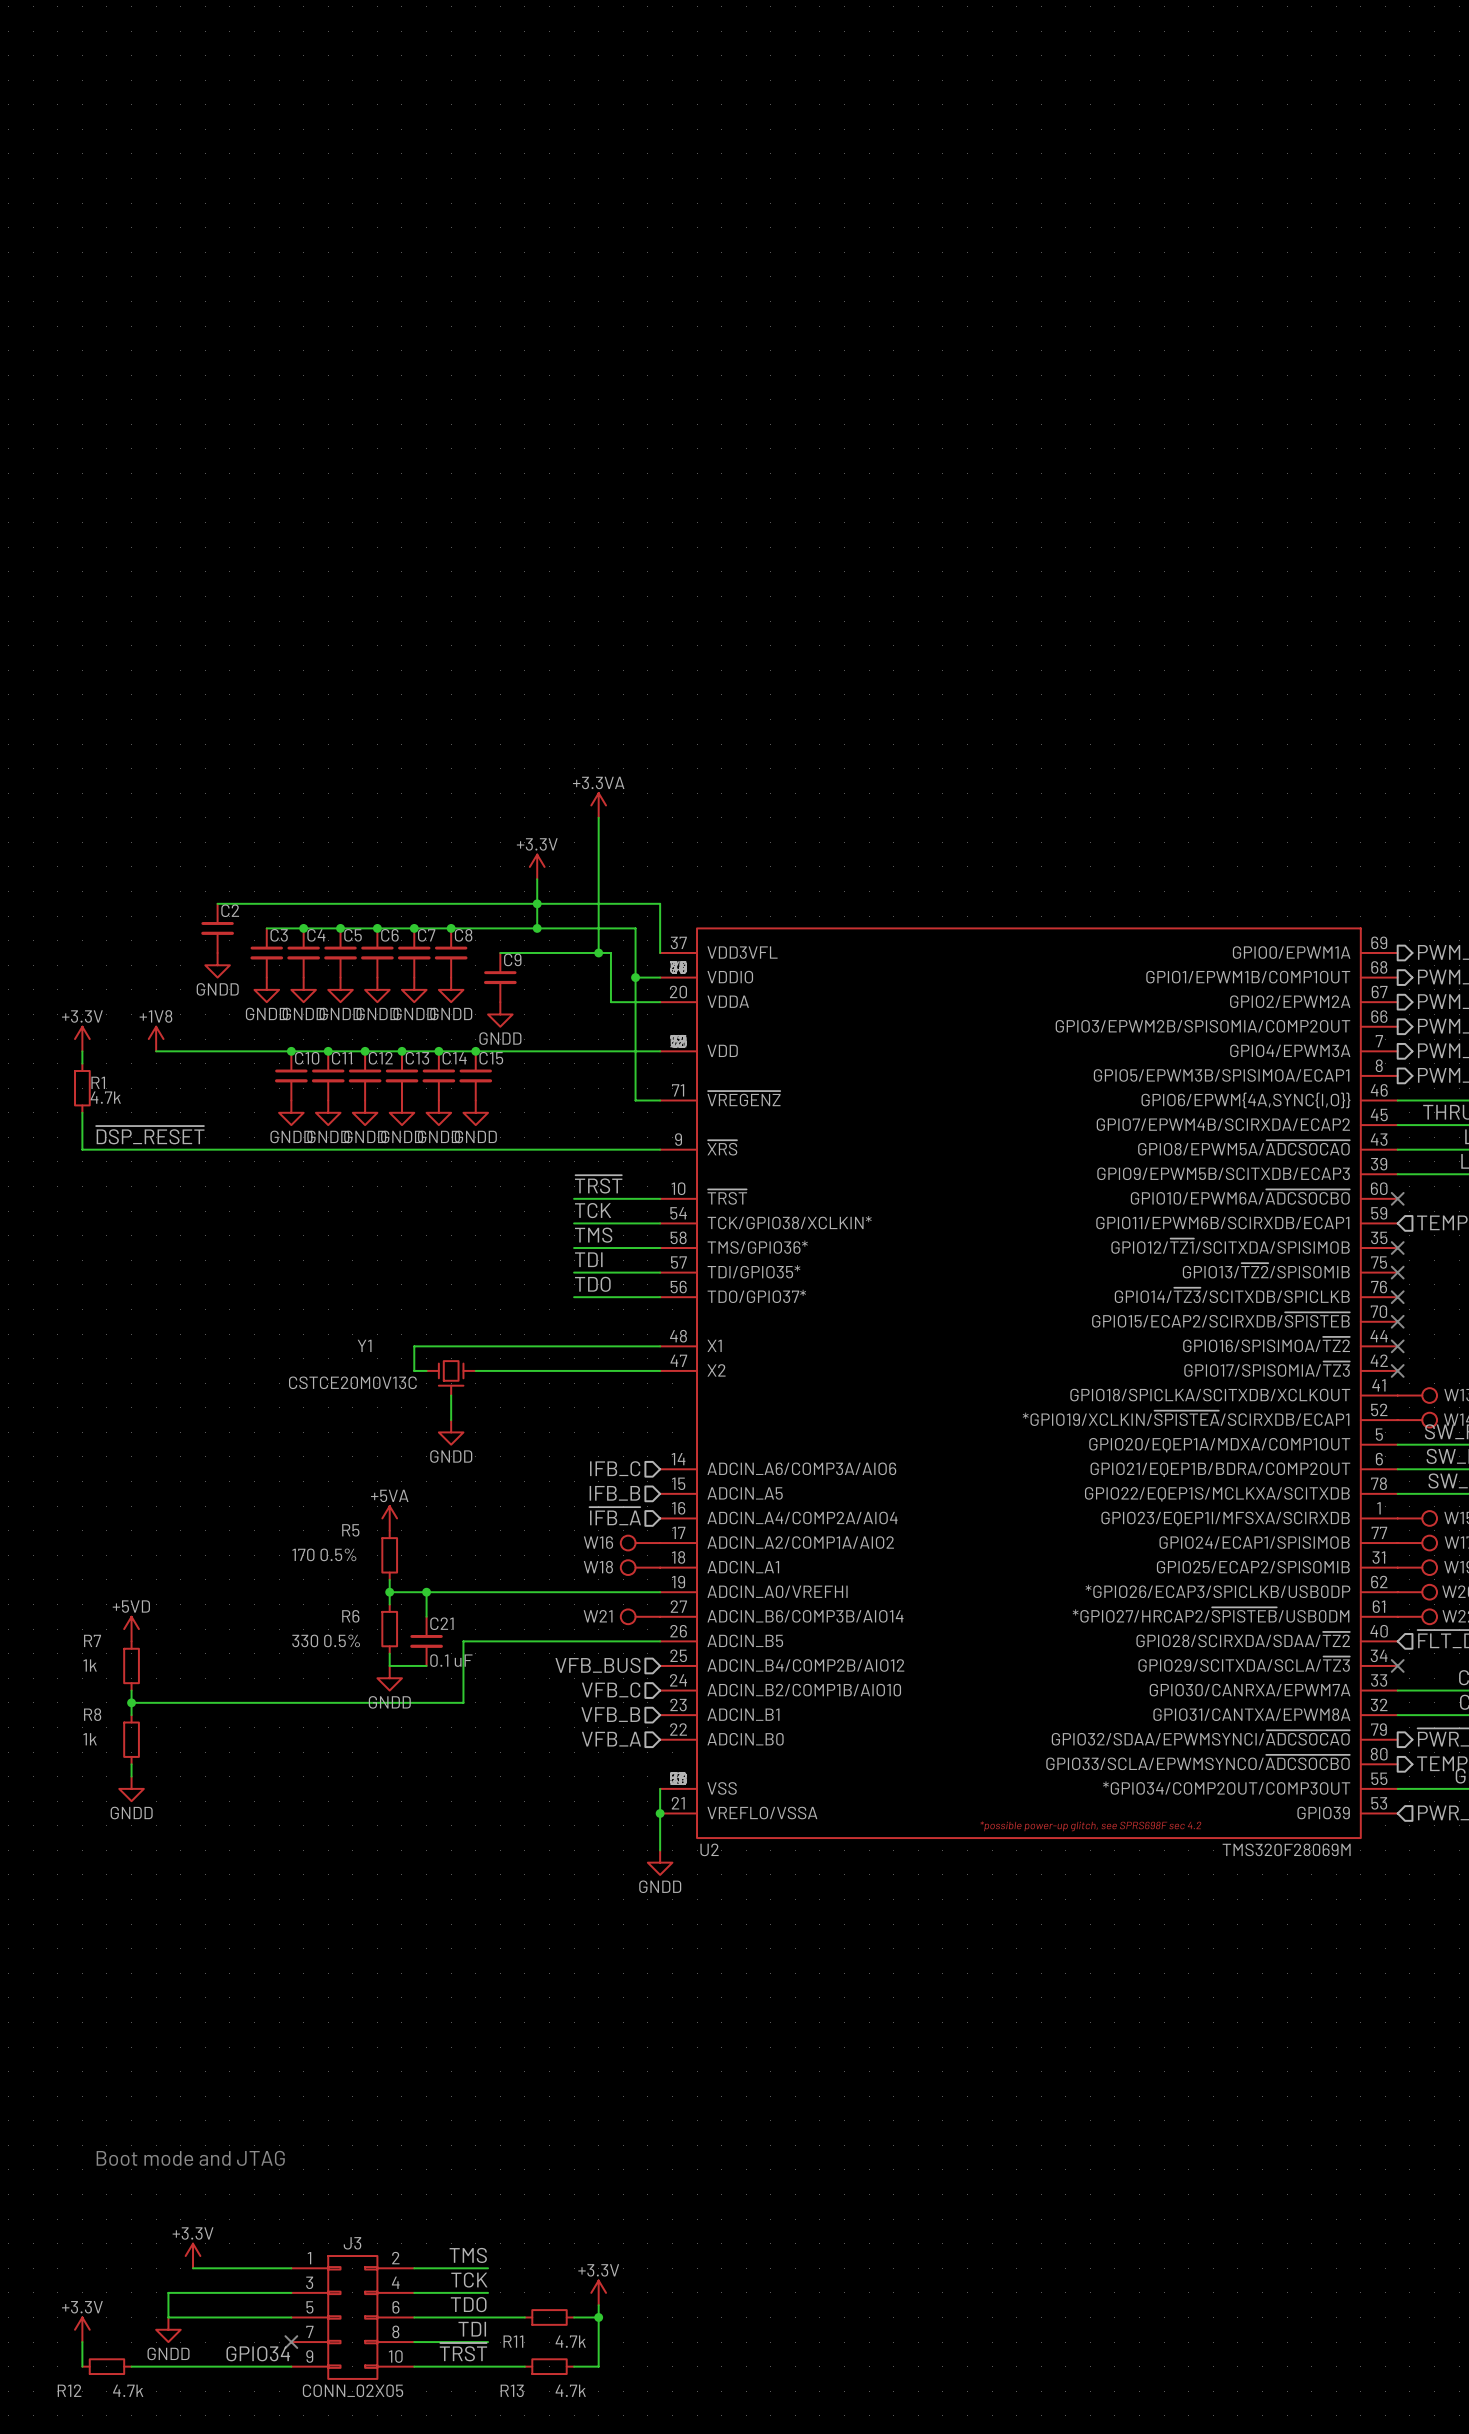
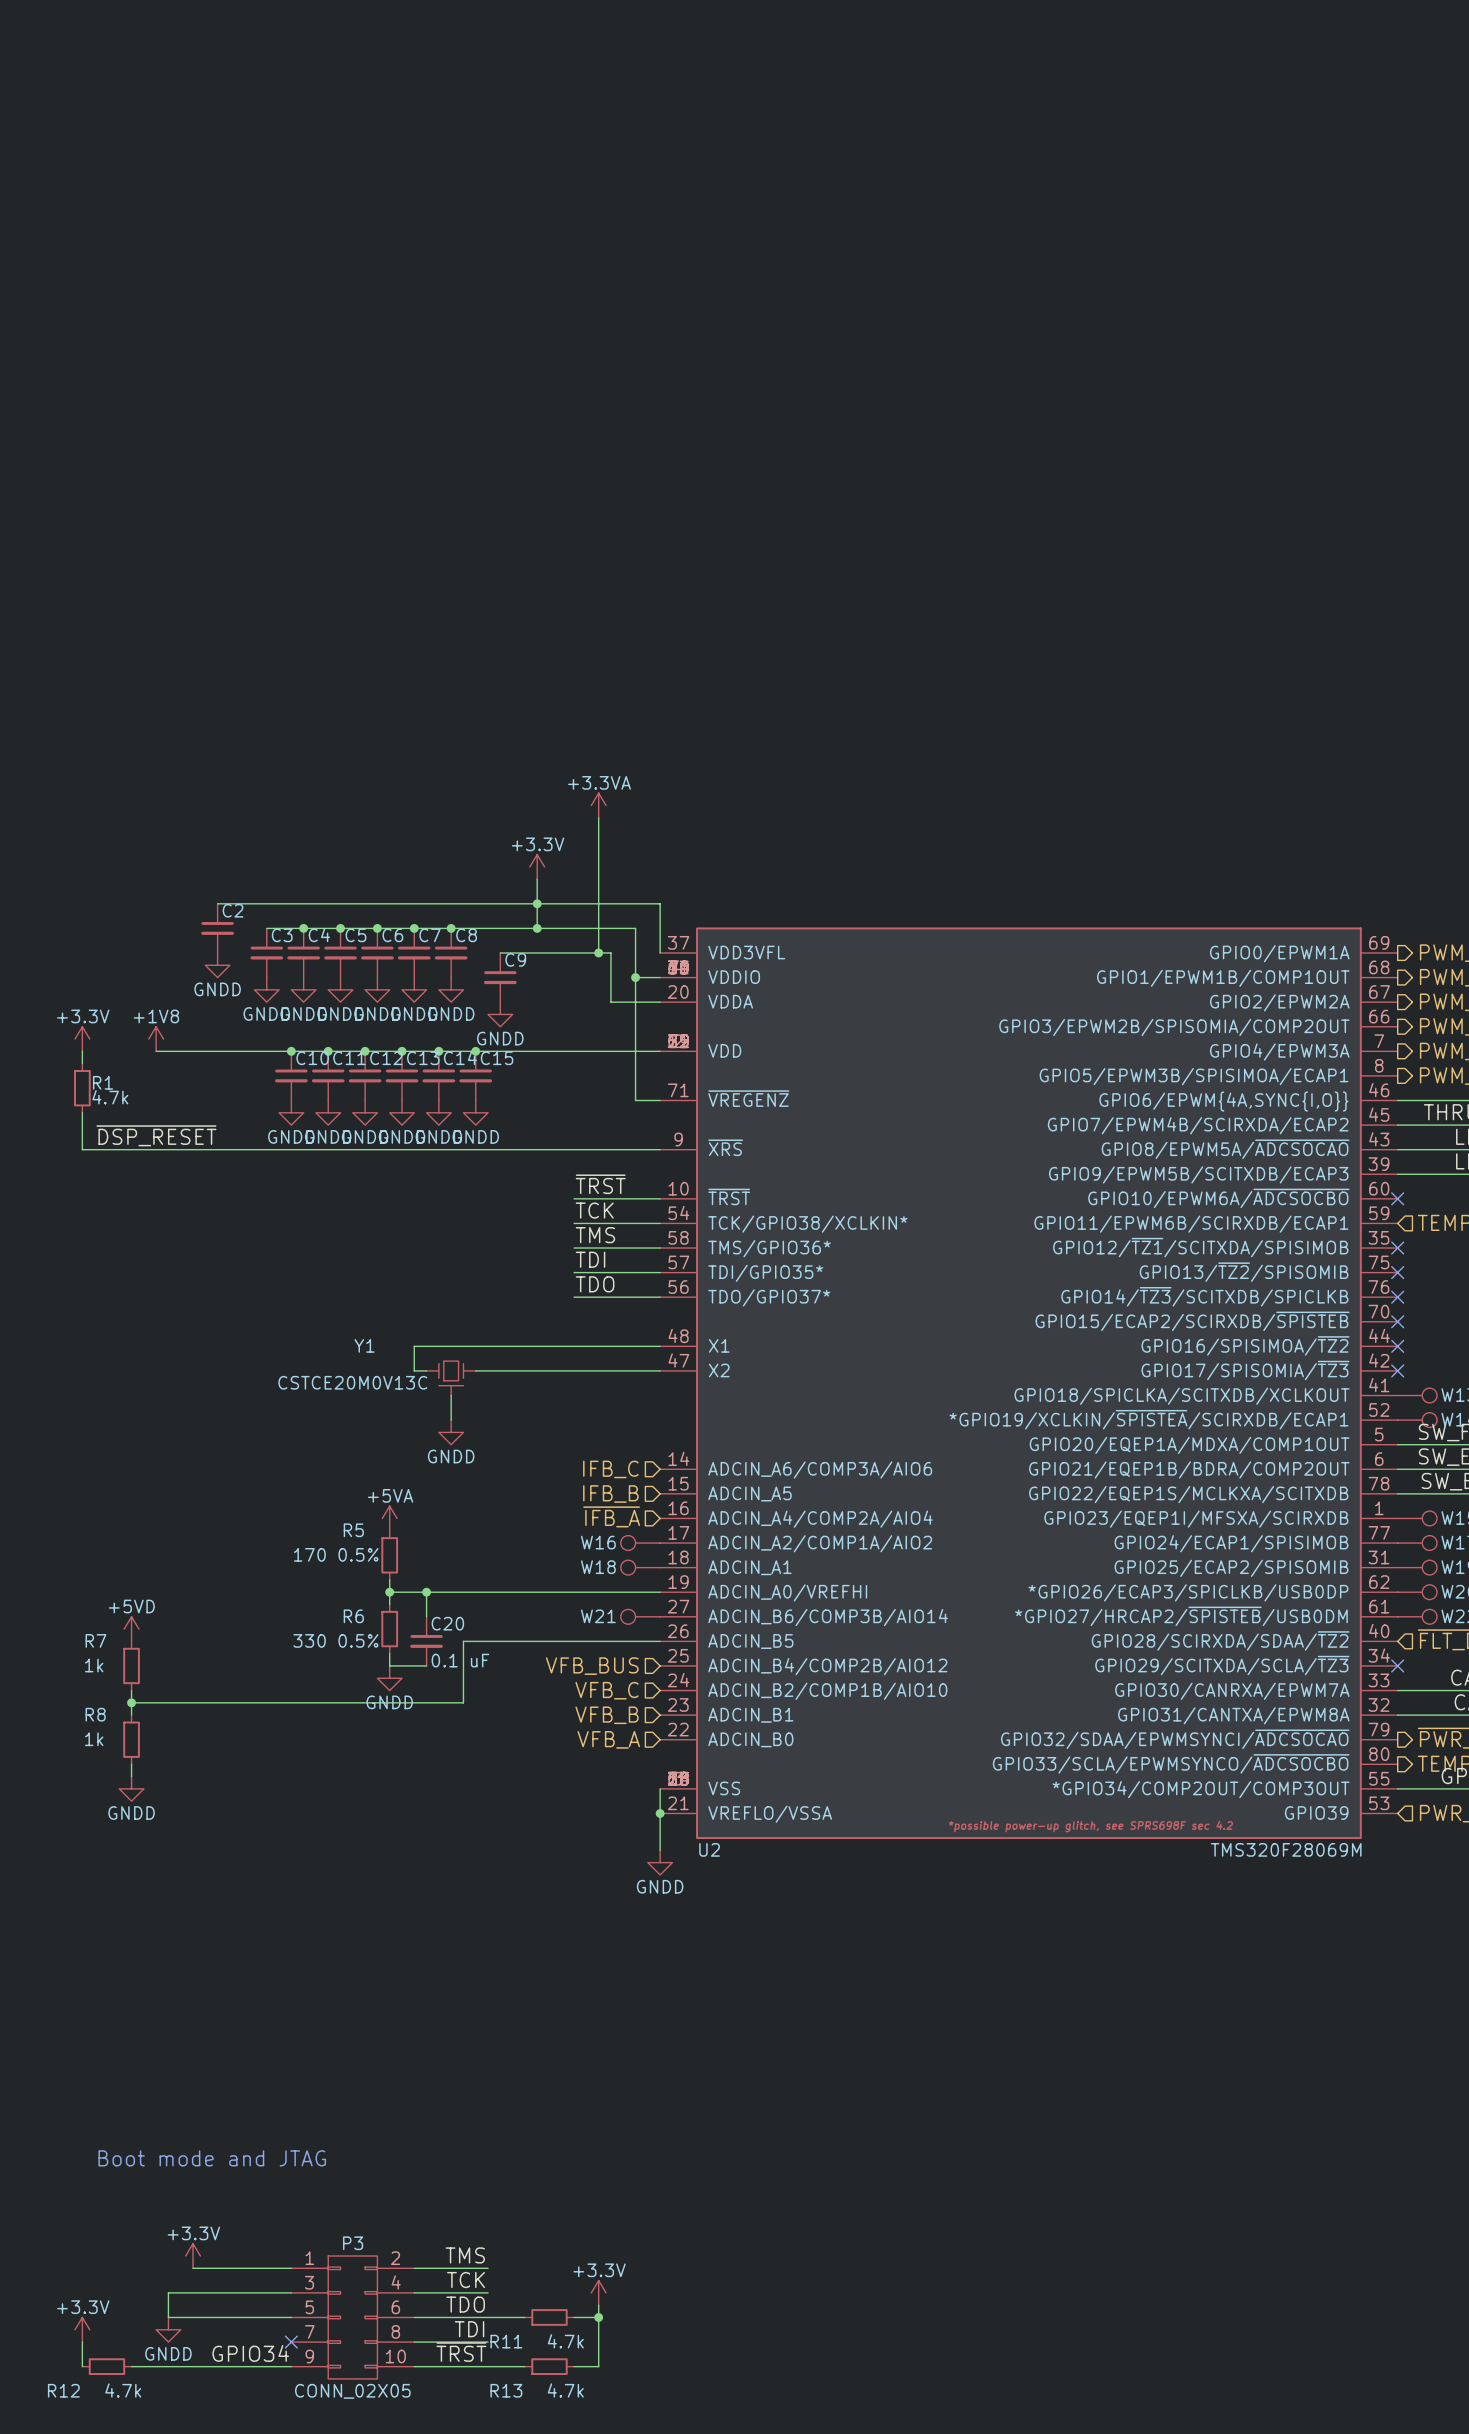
C21 name: C21 (441, 1623) -> C20 (447, 1623)
J3 name: J3 (352, 2243) -> P3 (353, 2243)

